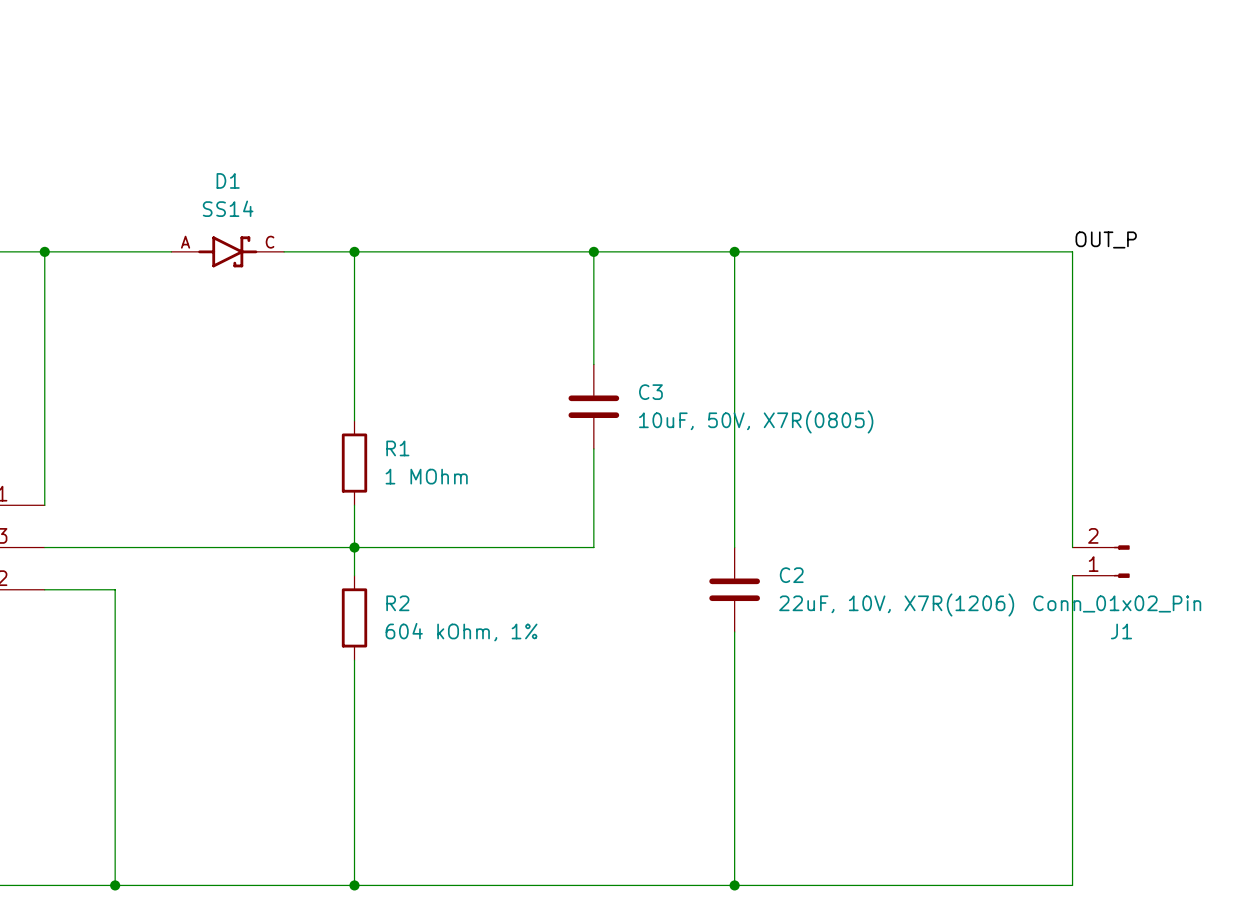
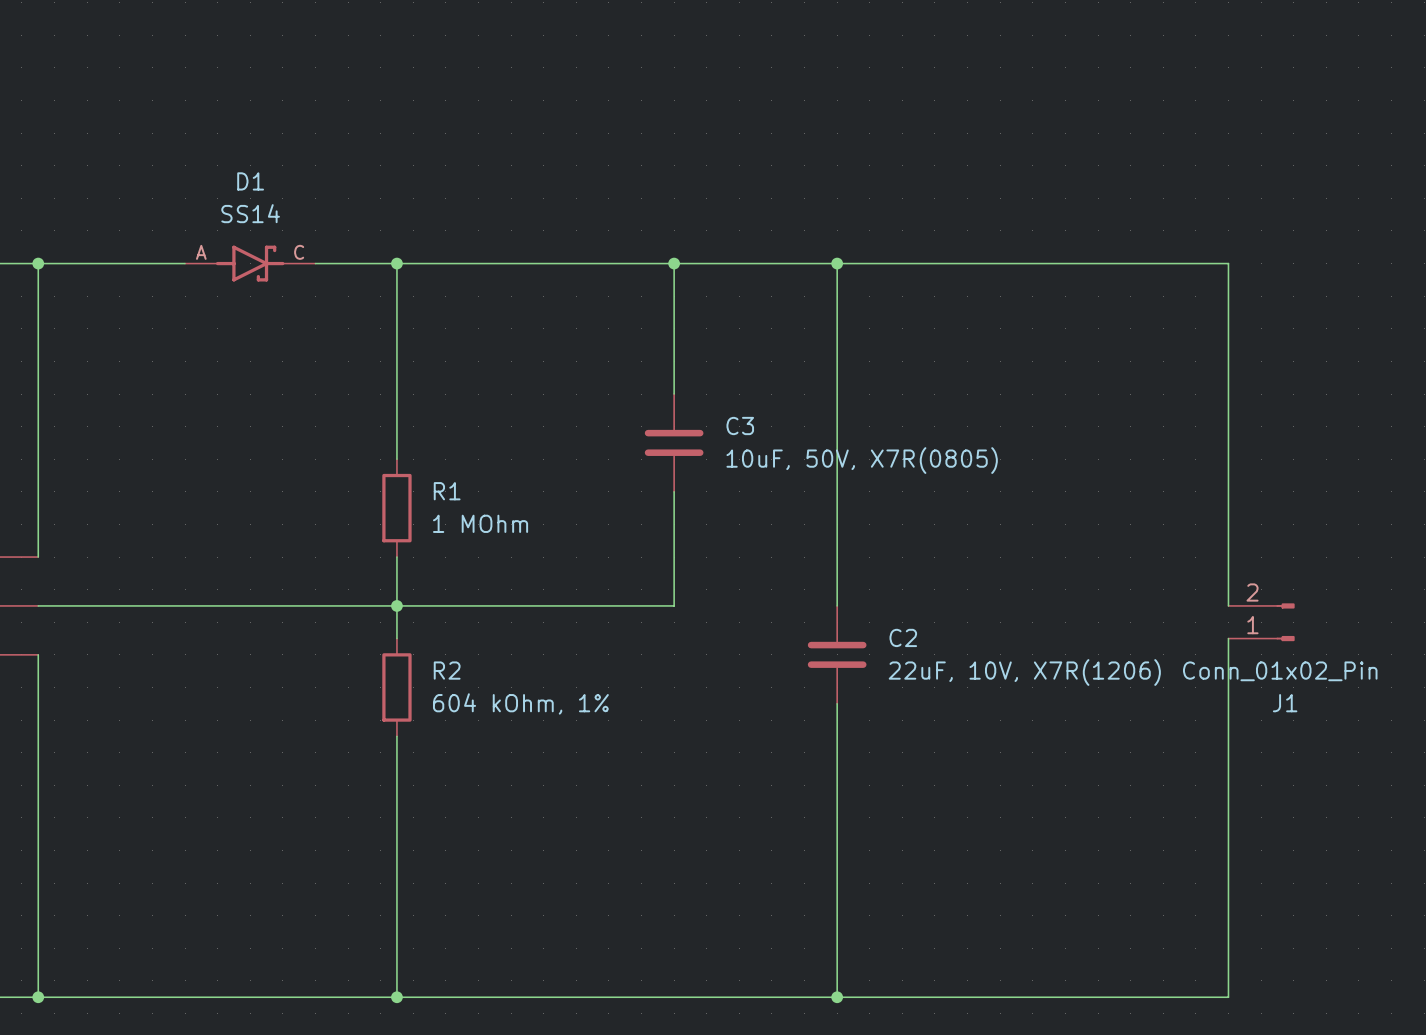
label: OUT_P (1106, 239) -> none
wire: (44, 589) (115, 589) (115, 885) -> (38, 654) (38, 997)
junction: none -> (38, 997)
junction: (115, 885) -> none

